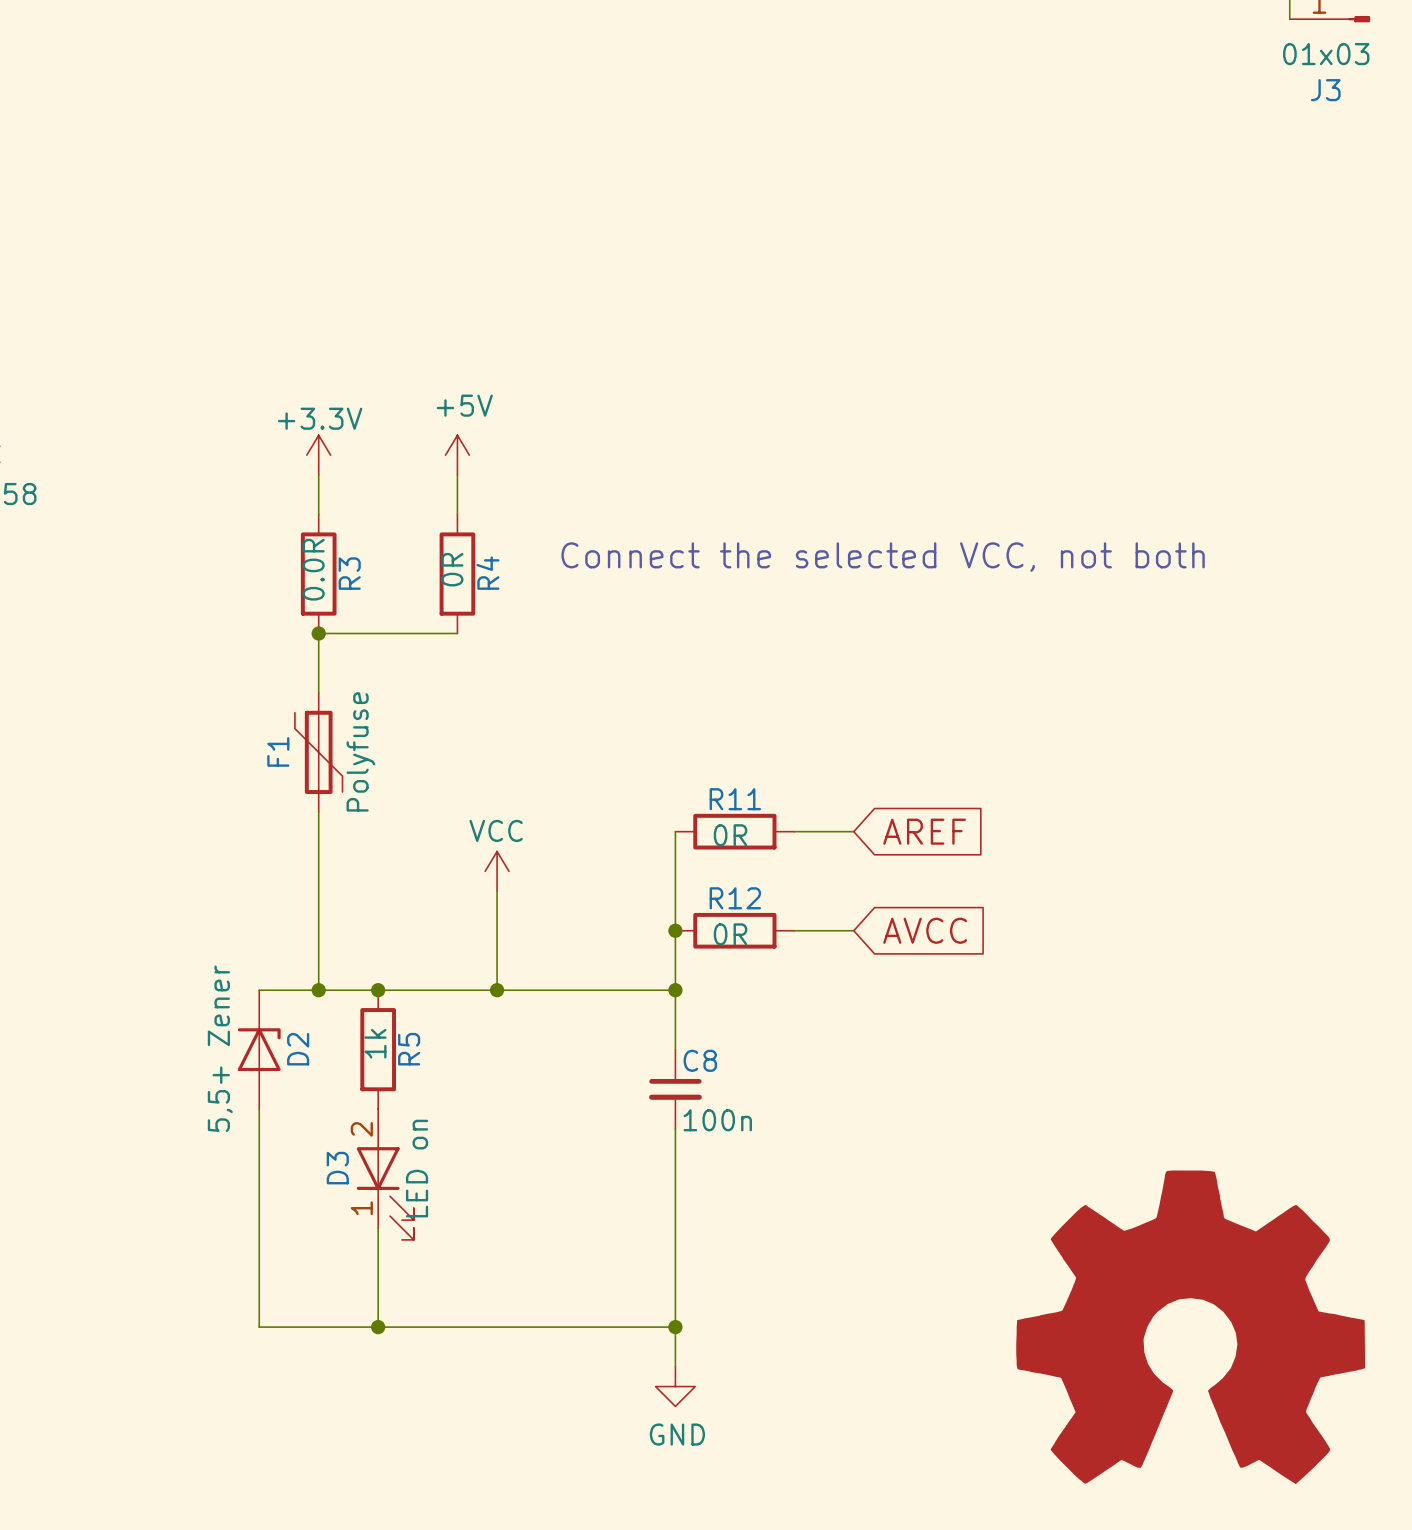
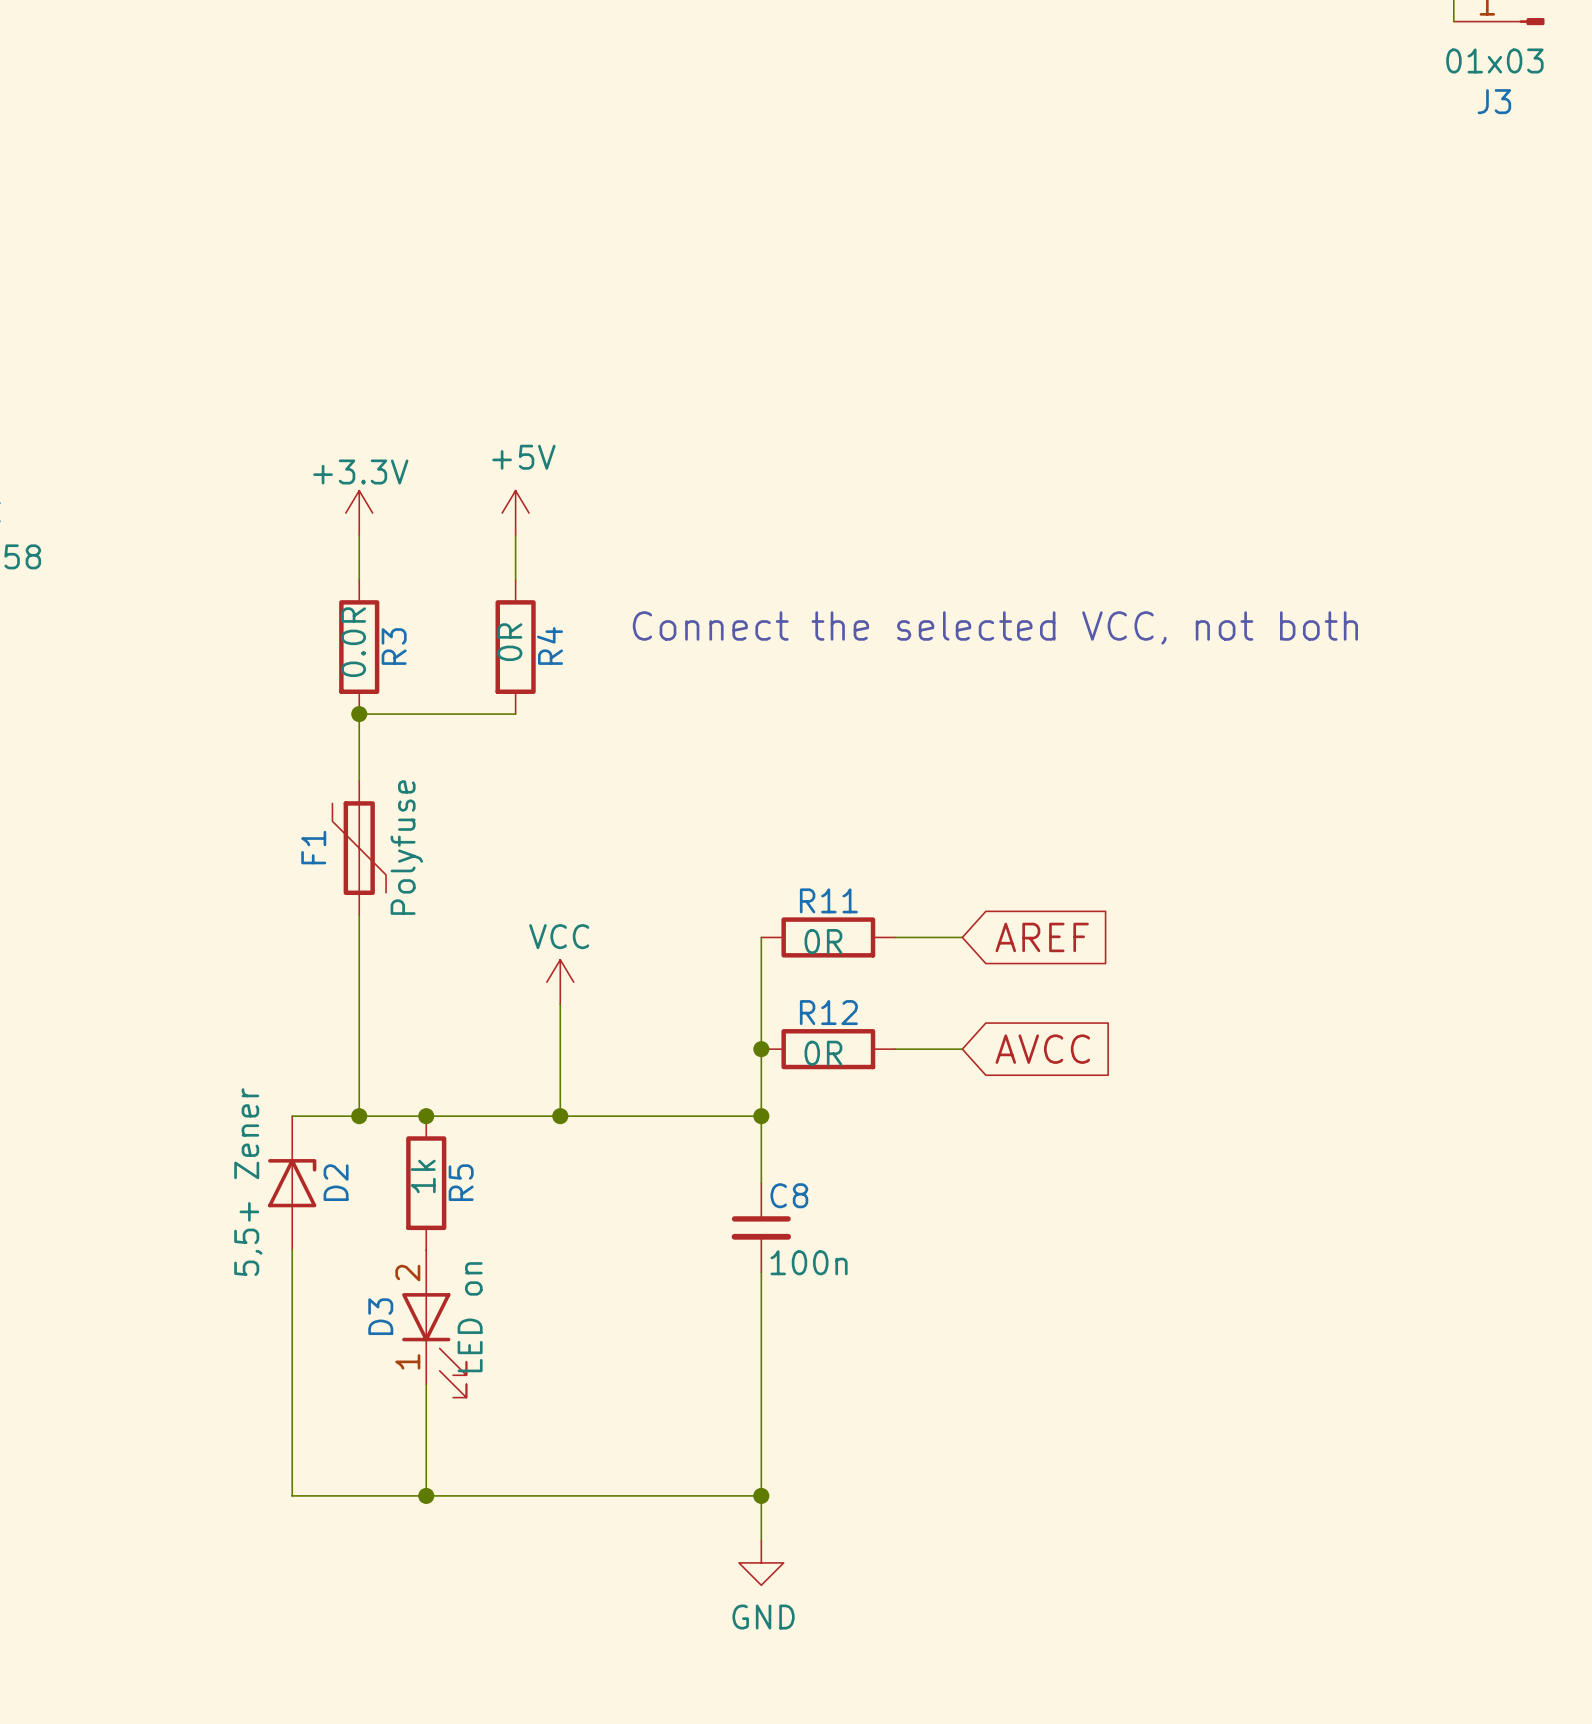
part: (1190, 1327) -> none

